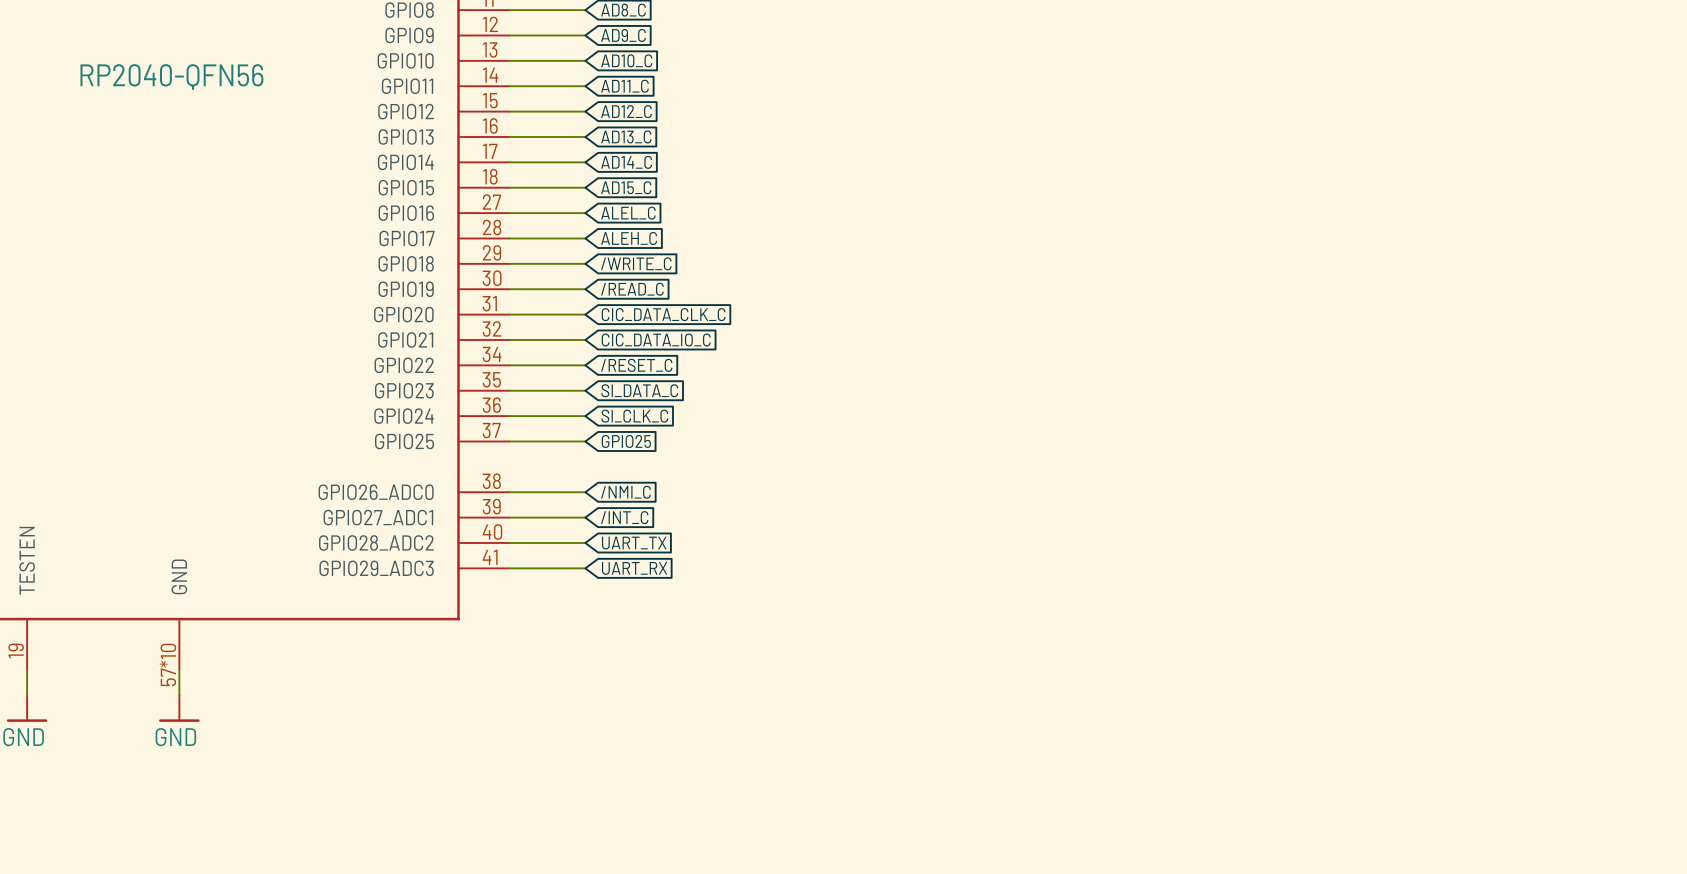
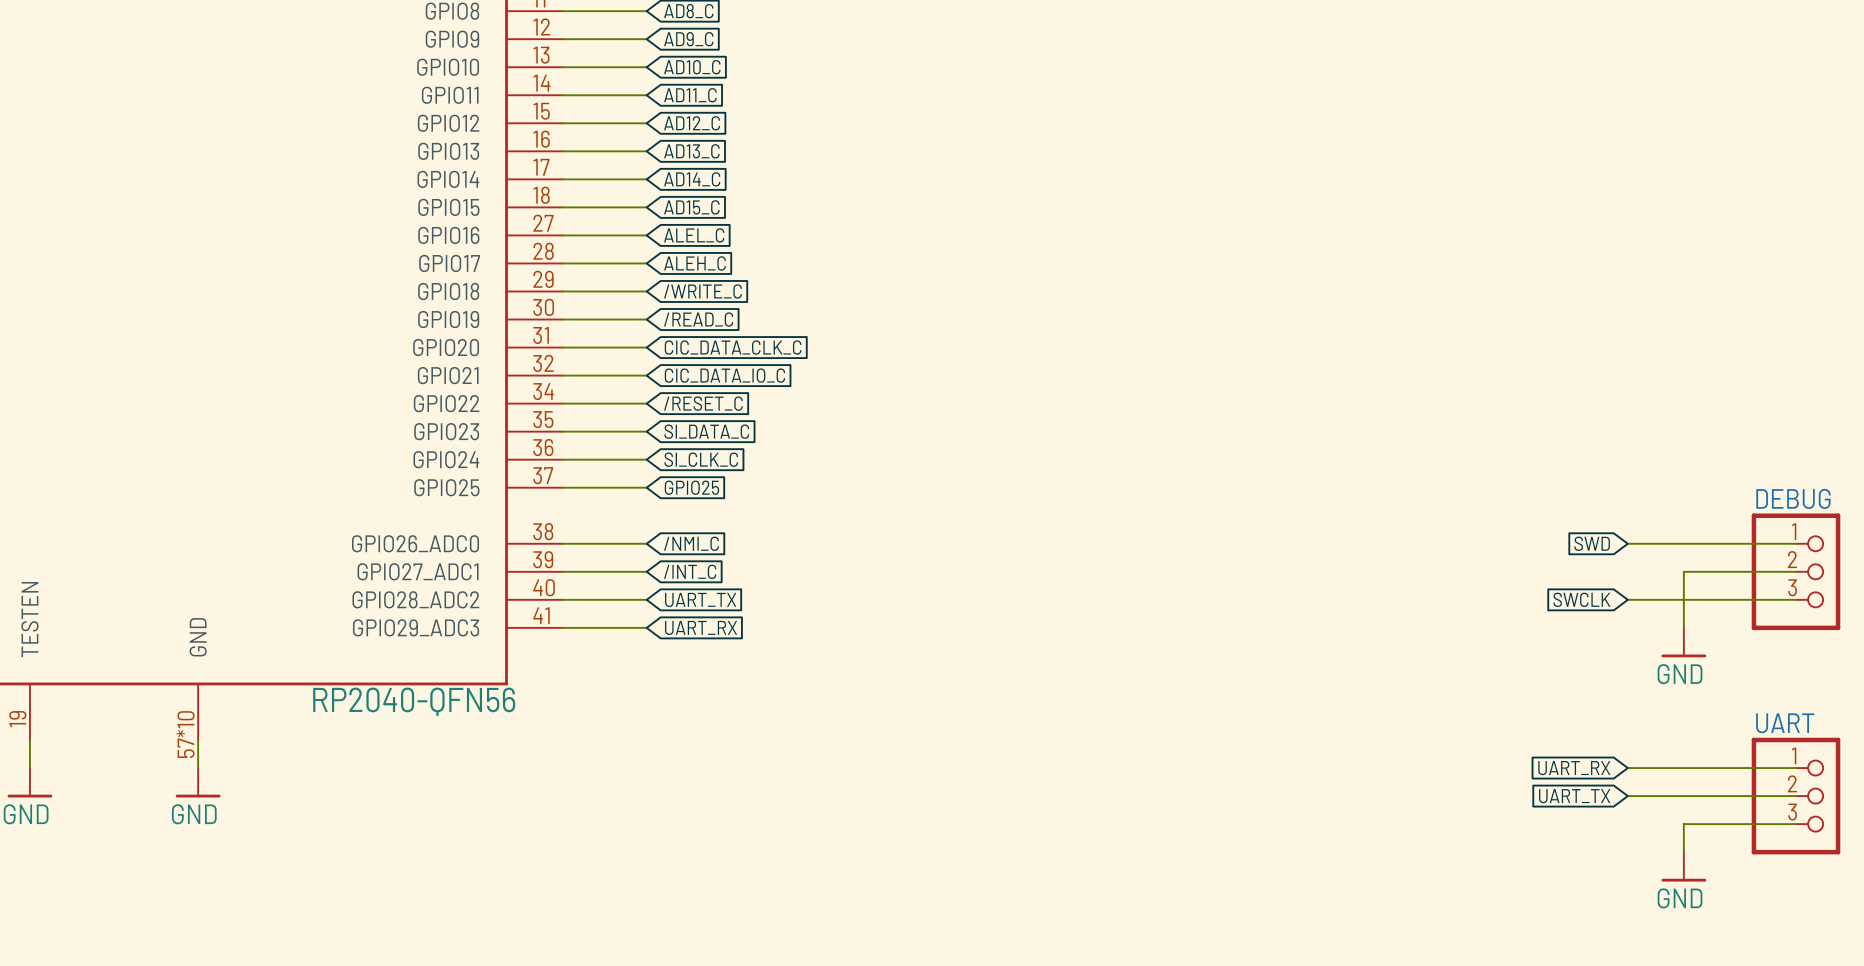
part value position: RP2040-QFN56 (171, 76) -> RP2040-QFN56 (414, 701)
global label: none -> SWD (1592, 543)
wire: none -> (1627, 543) (1795, 543)
wire: none -> (1795, 571) (1683, 571) (1683, 627)
DEBUG: none -> (1795, 571)
global label: none -> SWCLK (1581, 599)
wire: none -> (1627, 599) (1795, 599)
power symbol: none -> GND (1683, 642)
global label: none -> UART_RX (1574, 768)
wire: none -> (1627, 768) (1795, 768)
global label: none -> UART_TX (1574, 796)
wire: none -> (1627, 796) (1795, 796)
UART: none -> (1795, 796)
wire: none -> (1795, 824) (1683, 824) (1683, 852)
power symbol: none -> GND (1683, 866)

